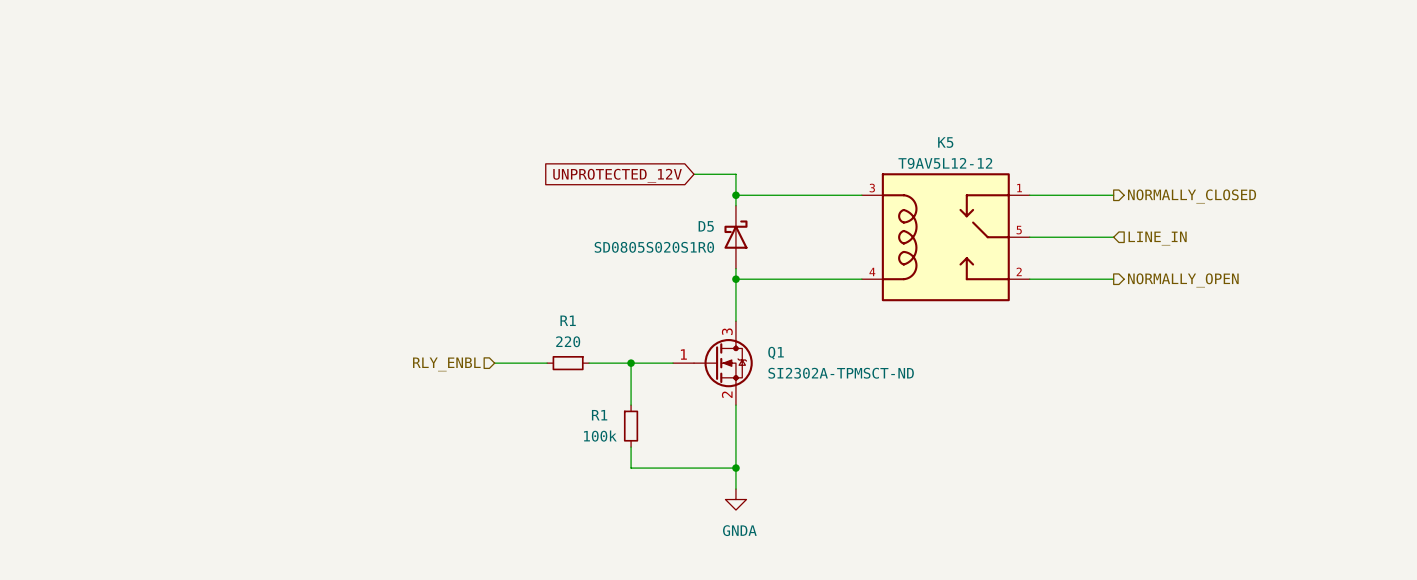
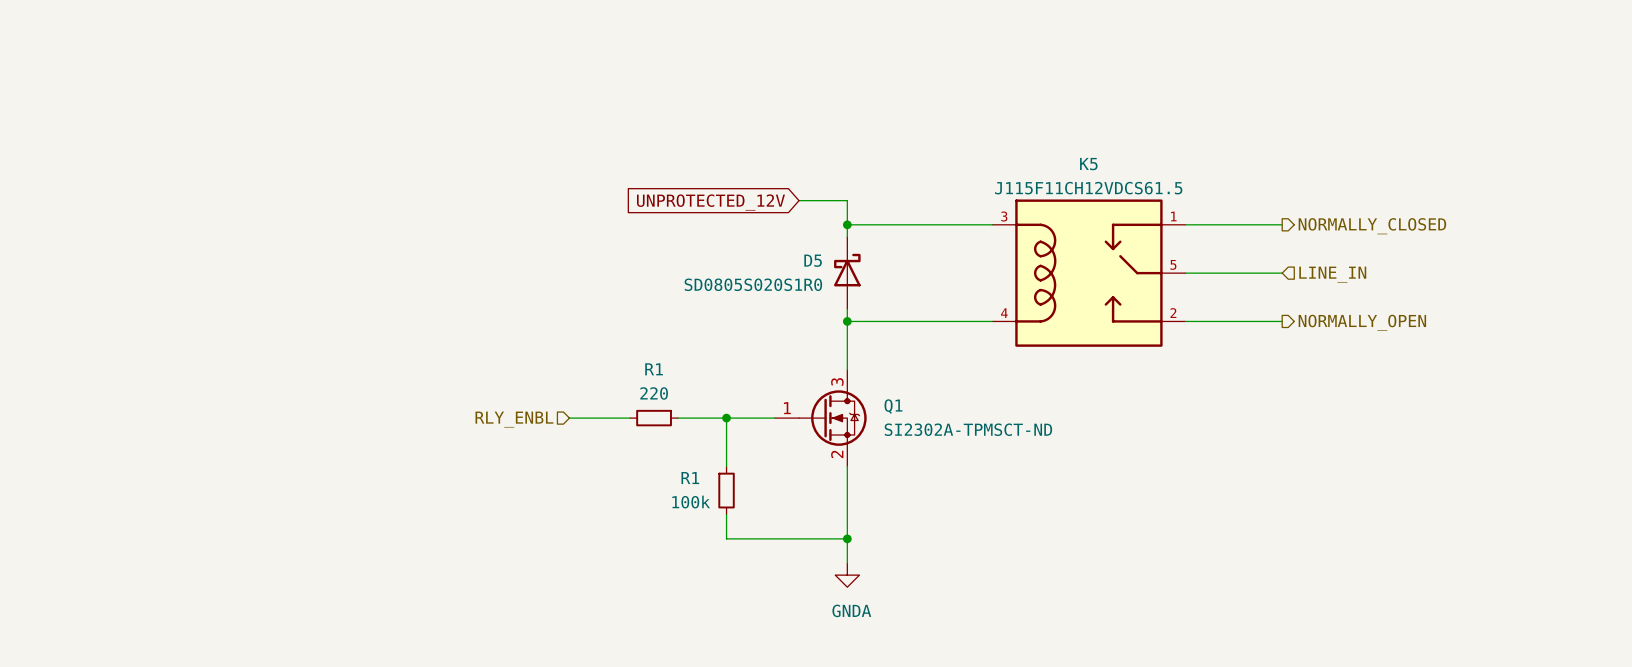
K5 value: T9AV5L12-12 (945, 163) -> J115F11CH12VDCS61.5 (1088, 188)

